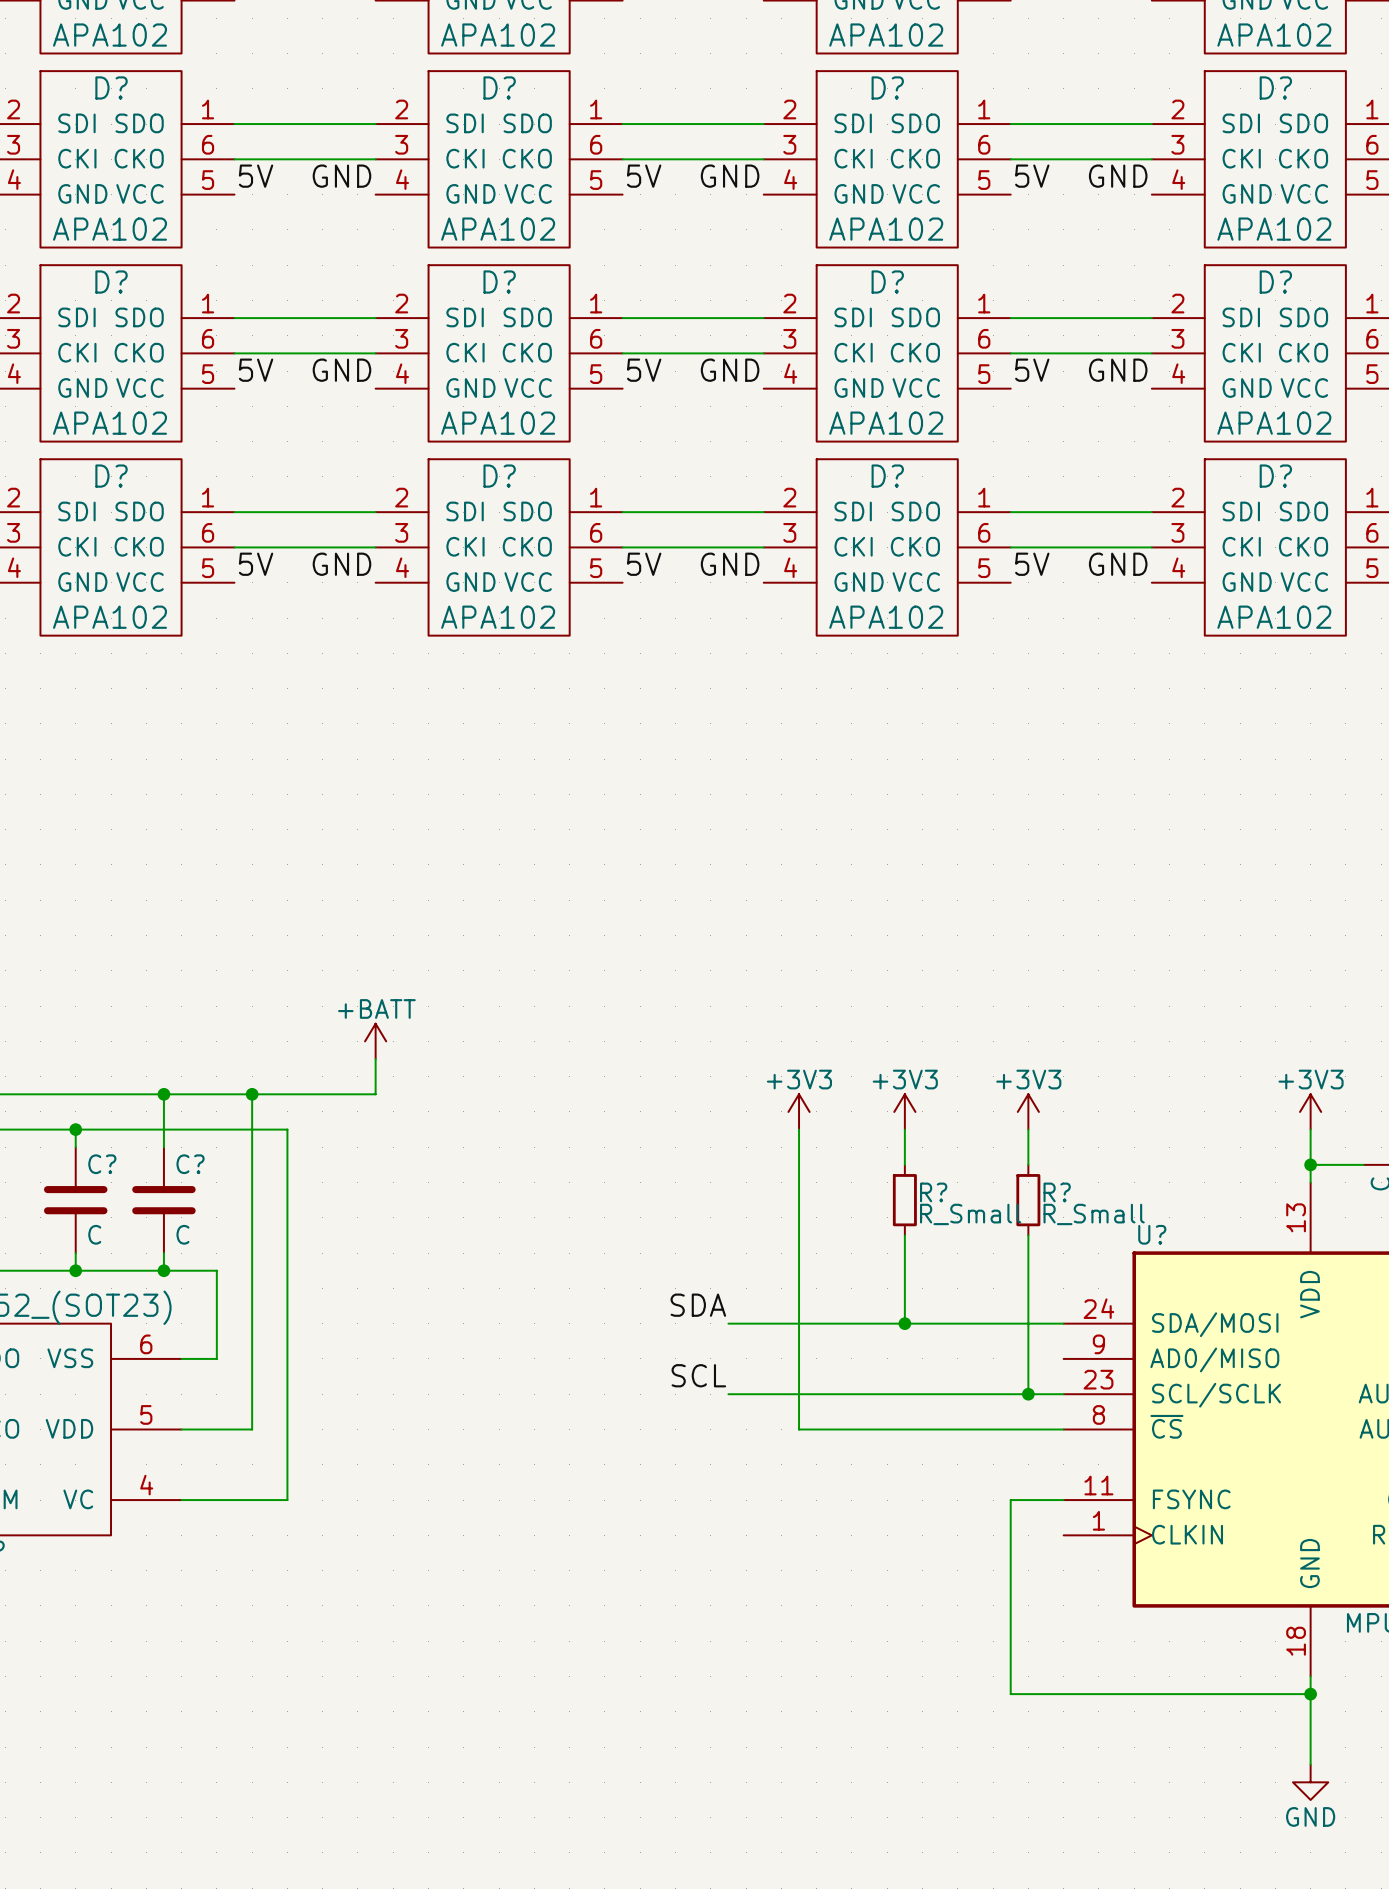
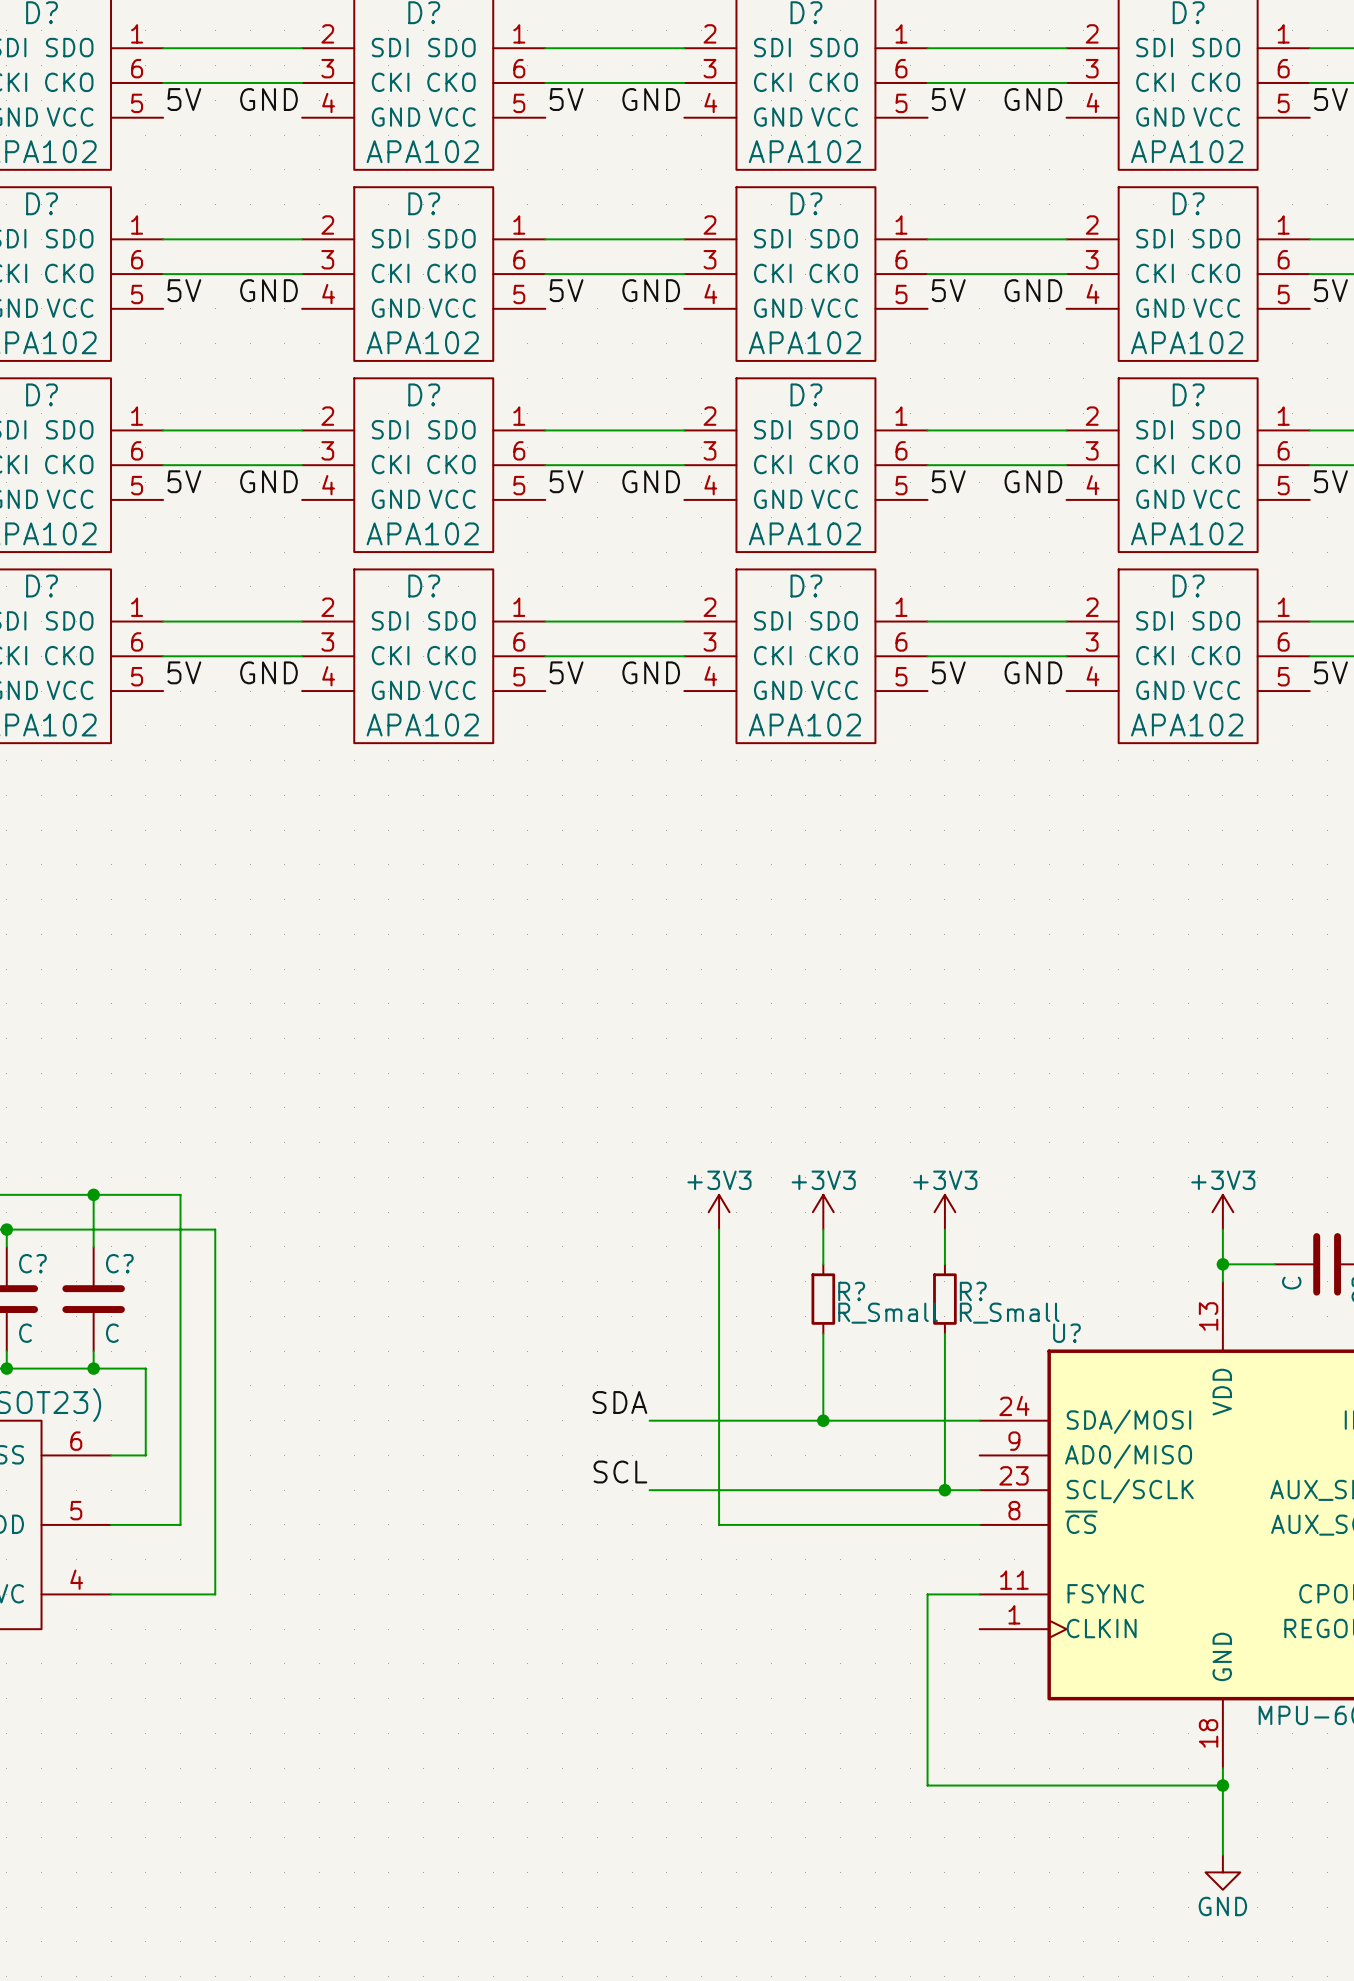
power symbol: +BATT (375, 1041) -> none
wire: (375, 1059) (375, 1094) (252, 1094) -> none
junction: (252, 1094) -> none

